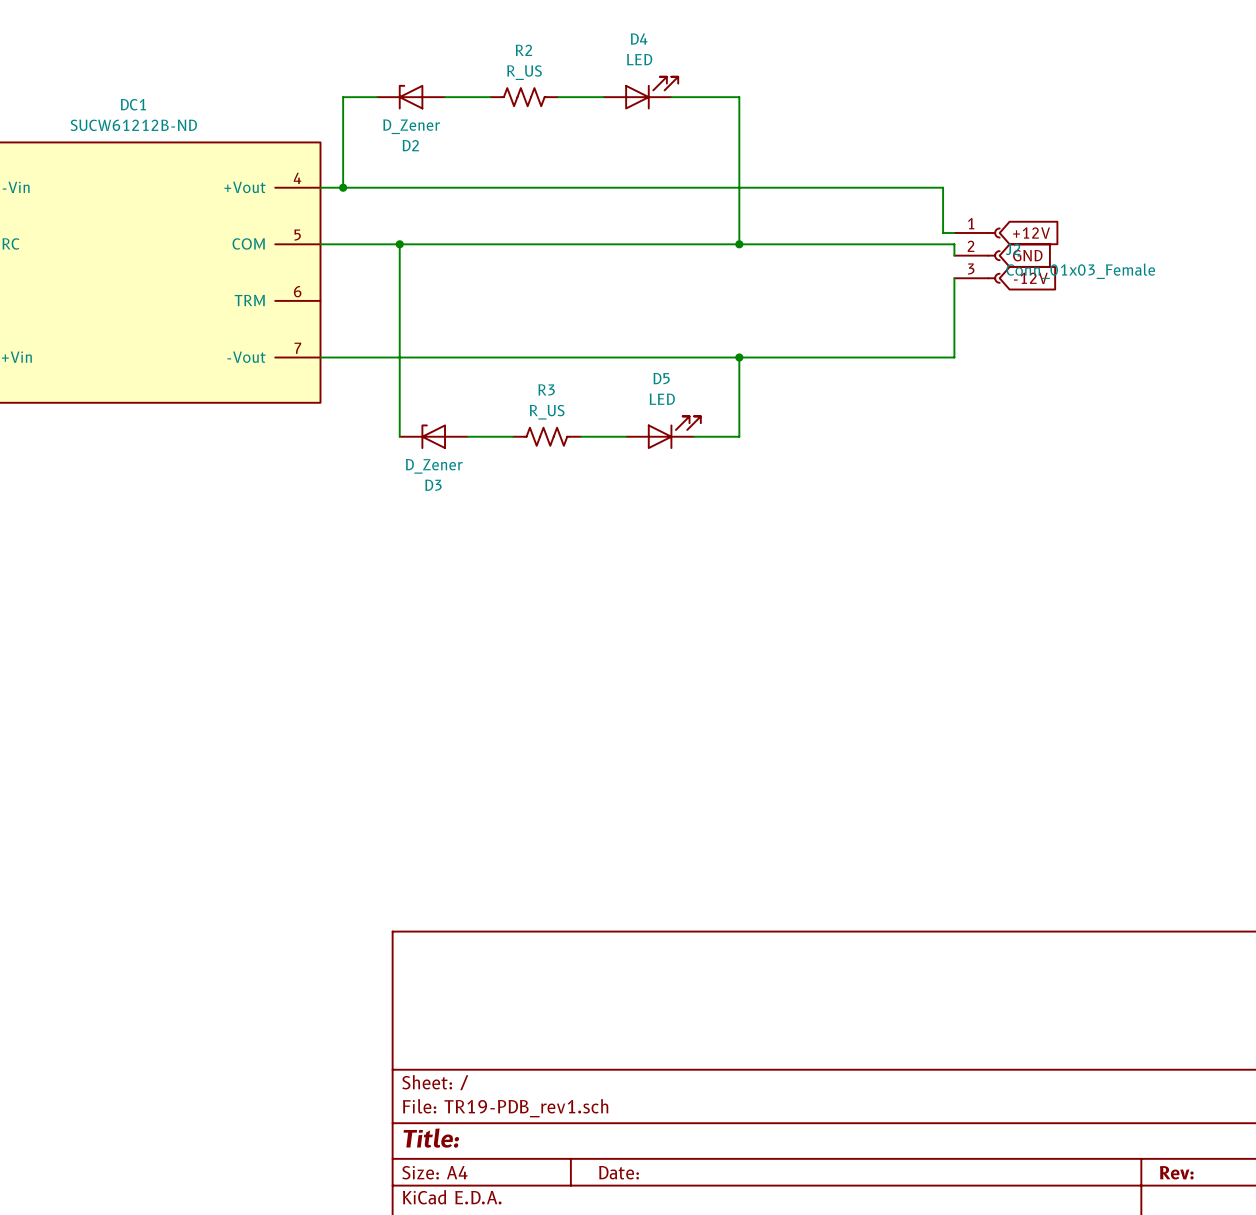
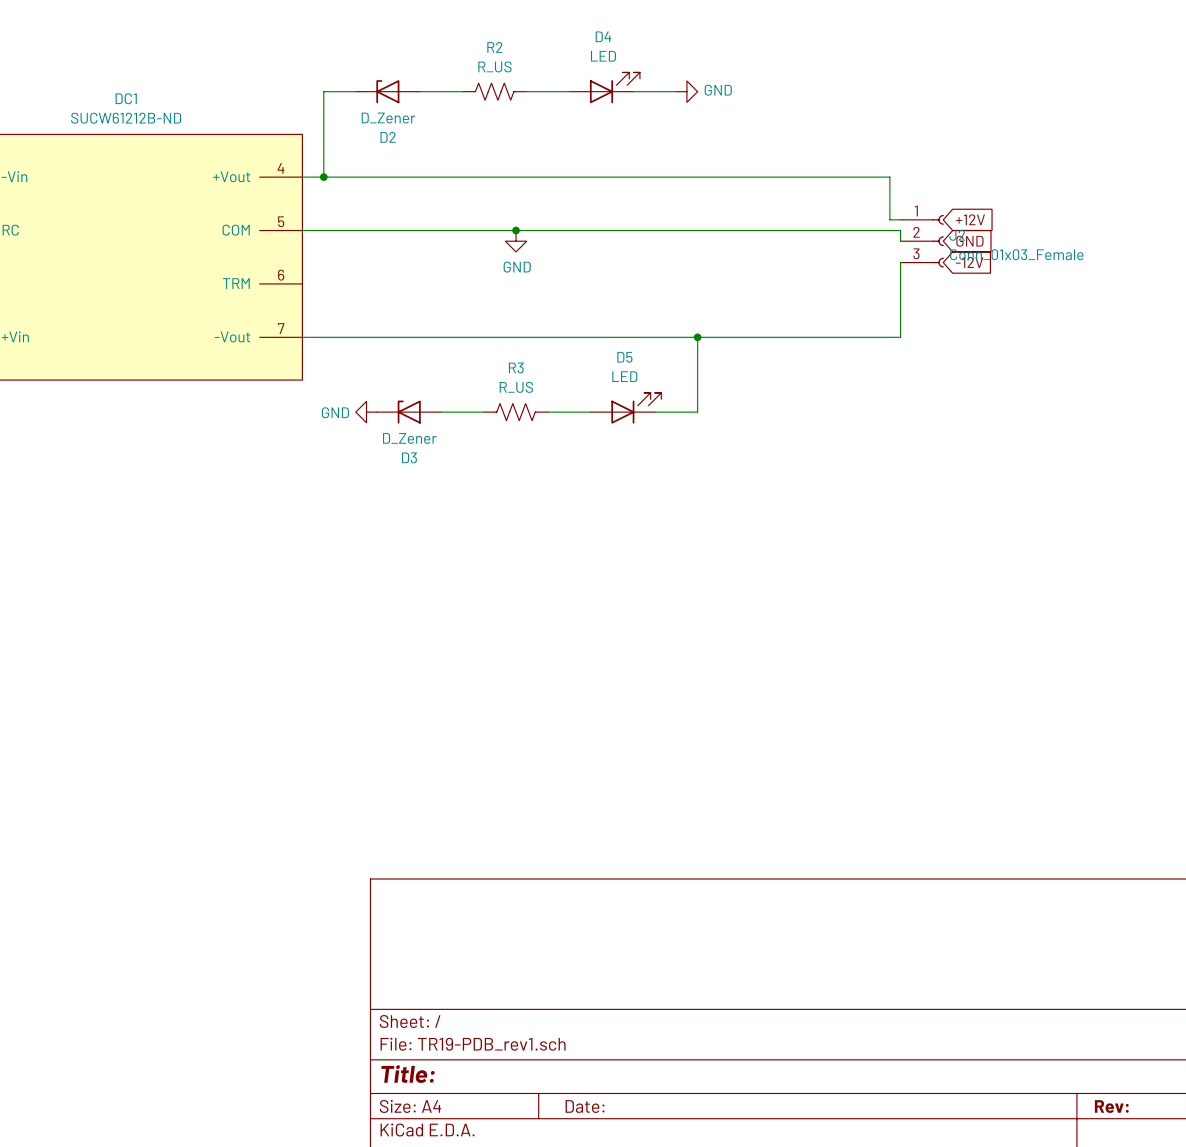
wire: (716, 97) (739, 97) (739, 244) -> none
power symbol: none -> GND (686, 91)
wire: (399, 244) (399, 436) -> none
junction: (399, 244) -> none
junction: none -> (516, 230)
junction: (739, 244) -> none
power symbol: none -> GND (516, 241)
power symbol: none -> GND (366, 412)

